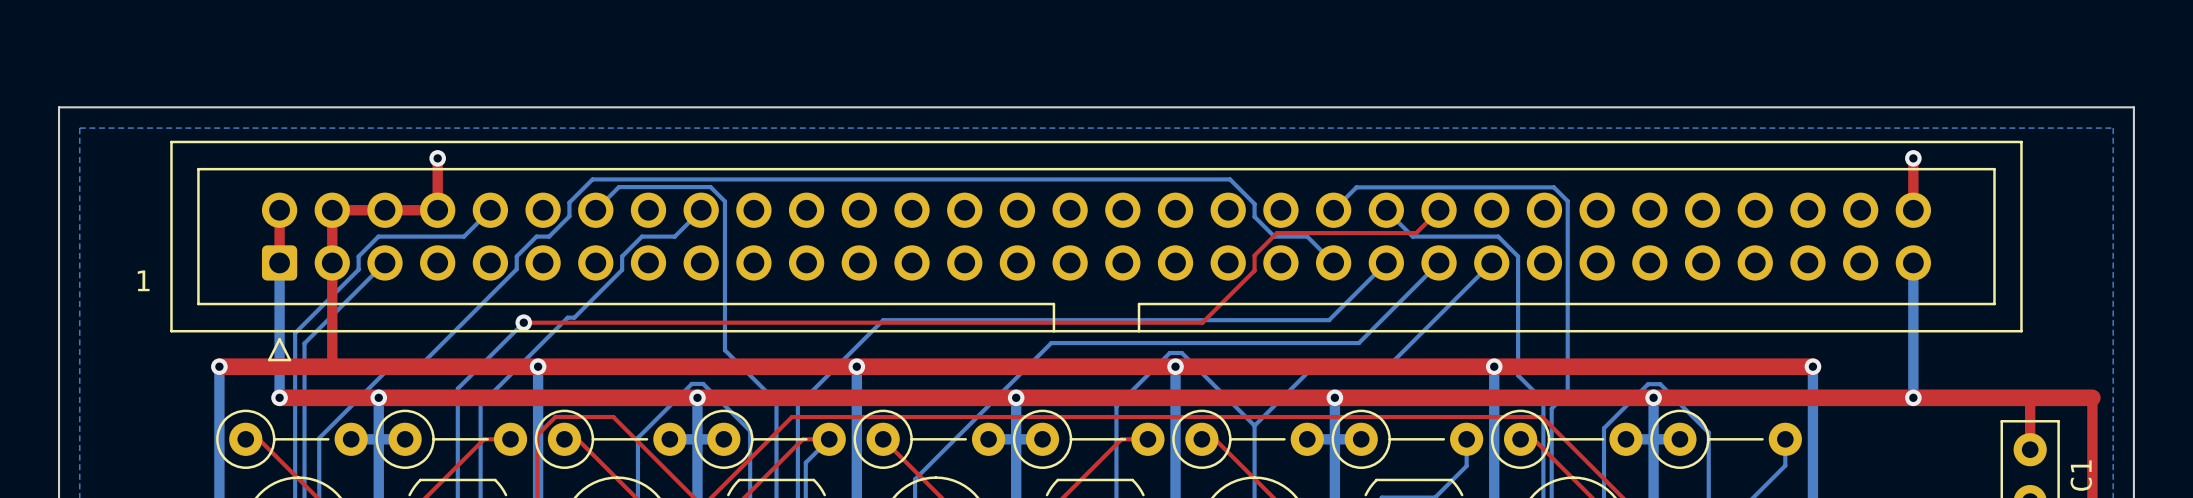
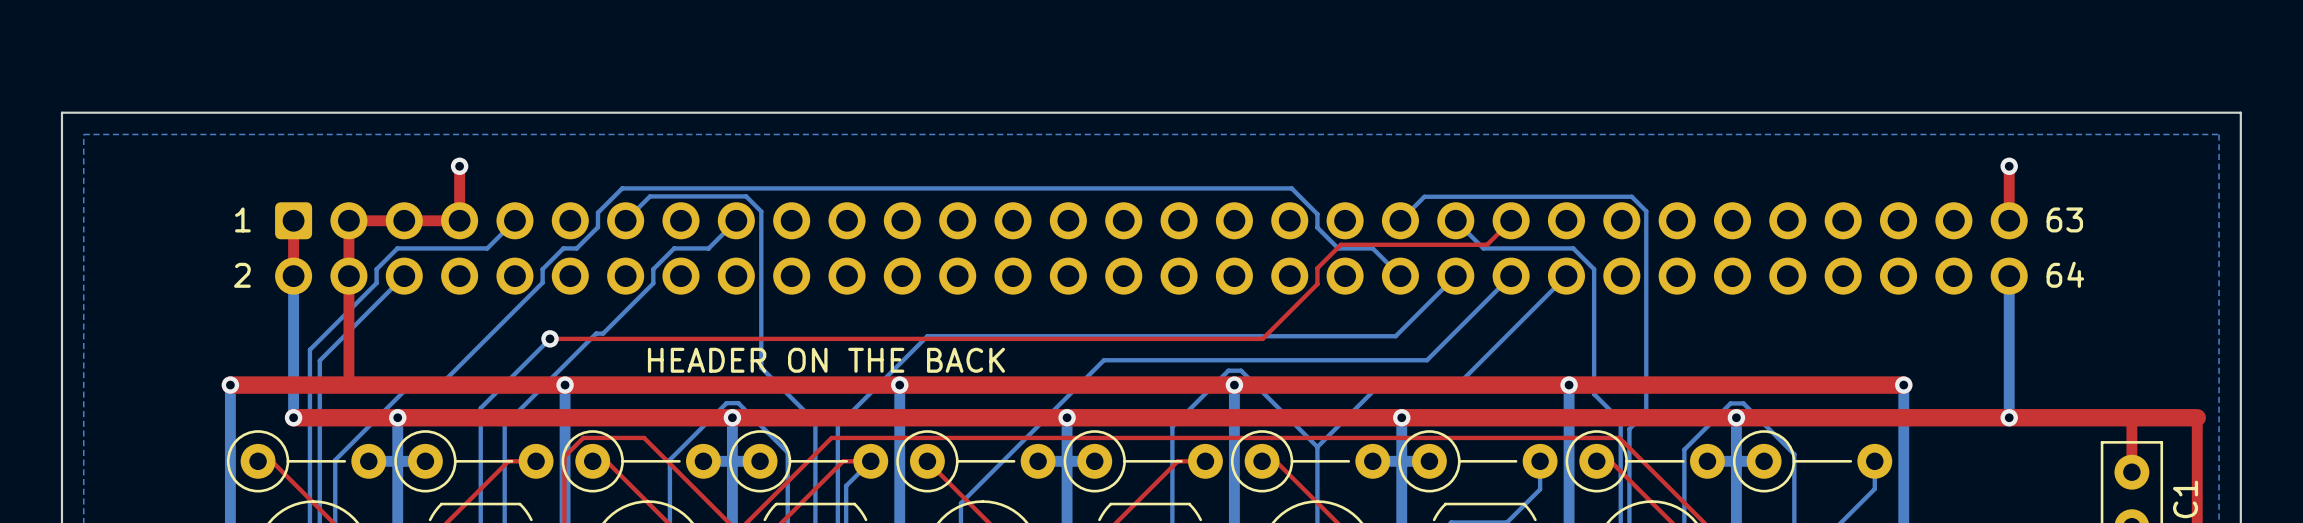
text: none -> 63 (2064, 219)
part side: top (1096, 251) -> bottom (1151, 248)
text: none -> 2 (242, 275)
text: none -> 64 (2065, 274)
text position: 1 (143, 280) -> 1 (242, 219)
text: none -> HEADER ON THE BACK (826, 360)

